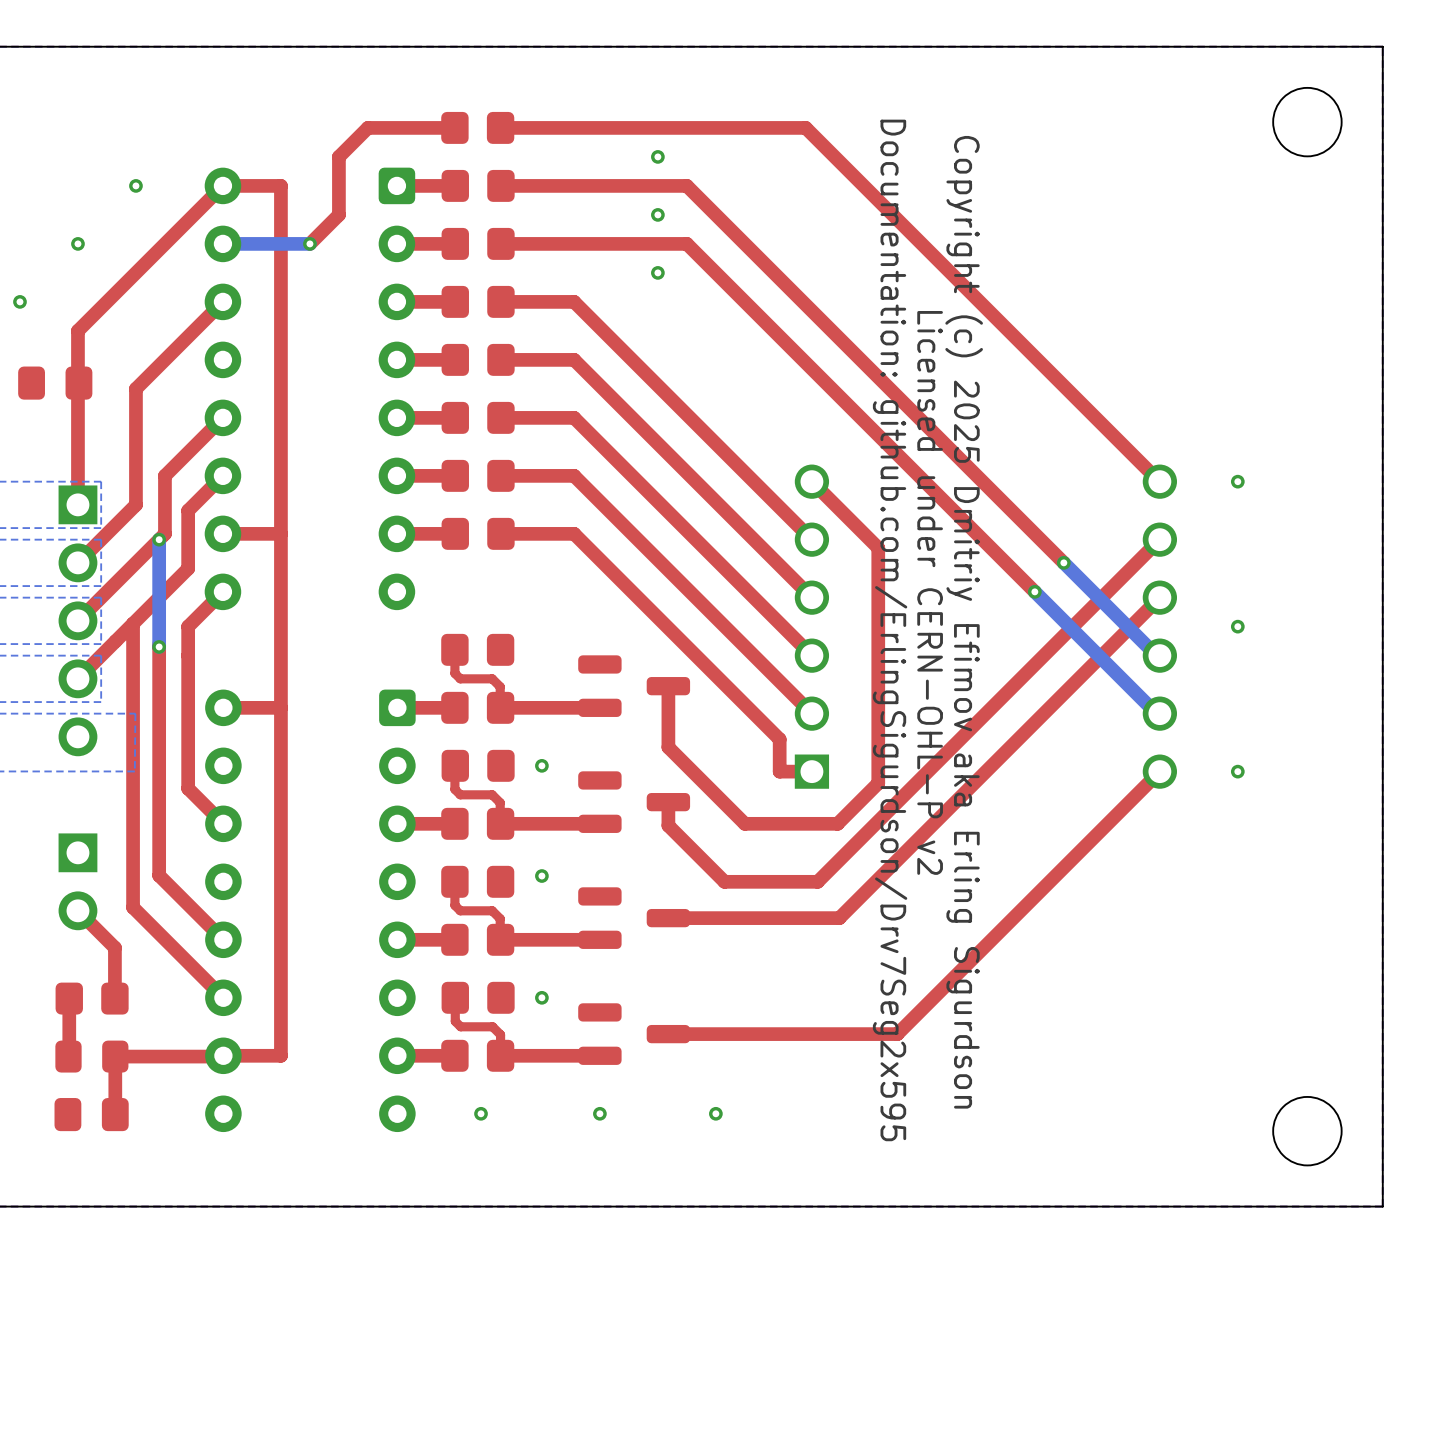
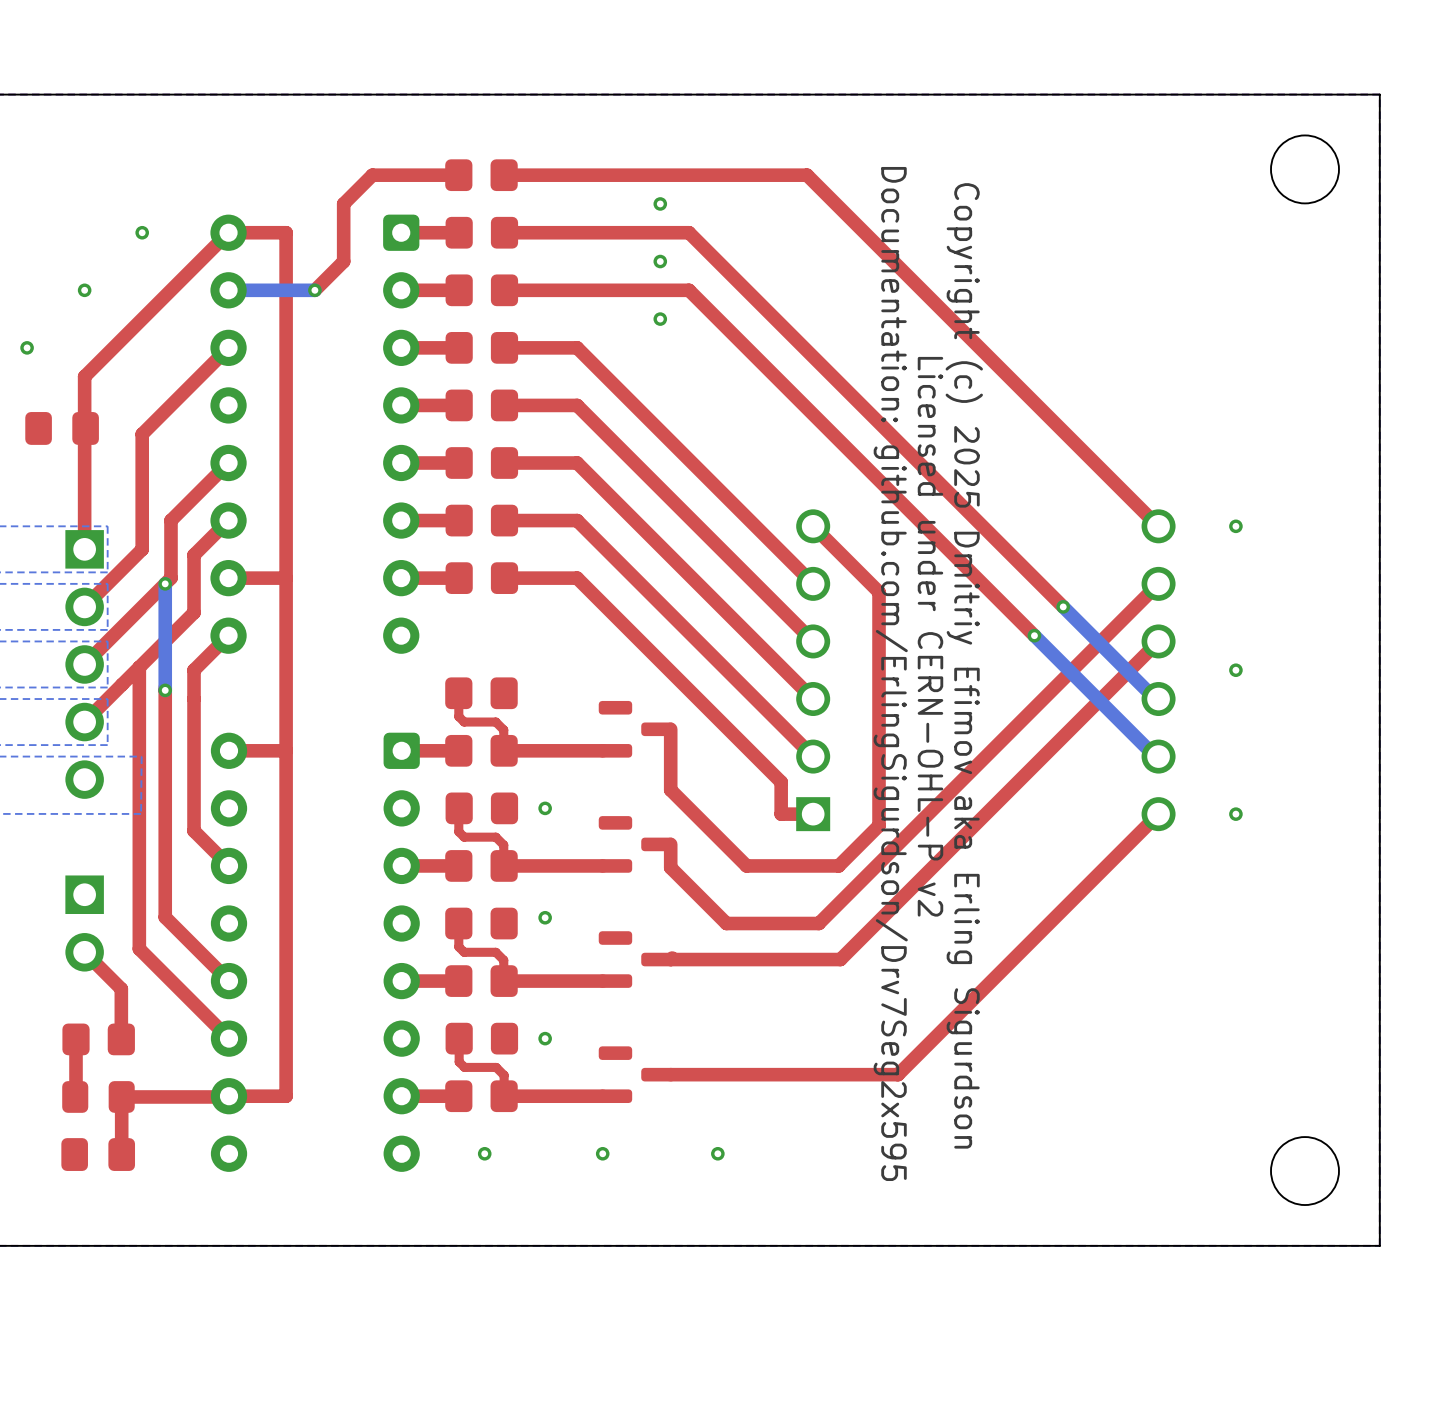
part footprint: [578, 655, 691, 717] -> [598, 700, 675, 758]
part footprint: [578, 771, 691, 833] -> [598, 816, 675, 873]
part footprint: [578, 887, 691, 949] -> [598, 931, 675, 988]
part footprint: [578, 1003, 691, 1065] -> [598, 1046, 675, 1104]

